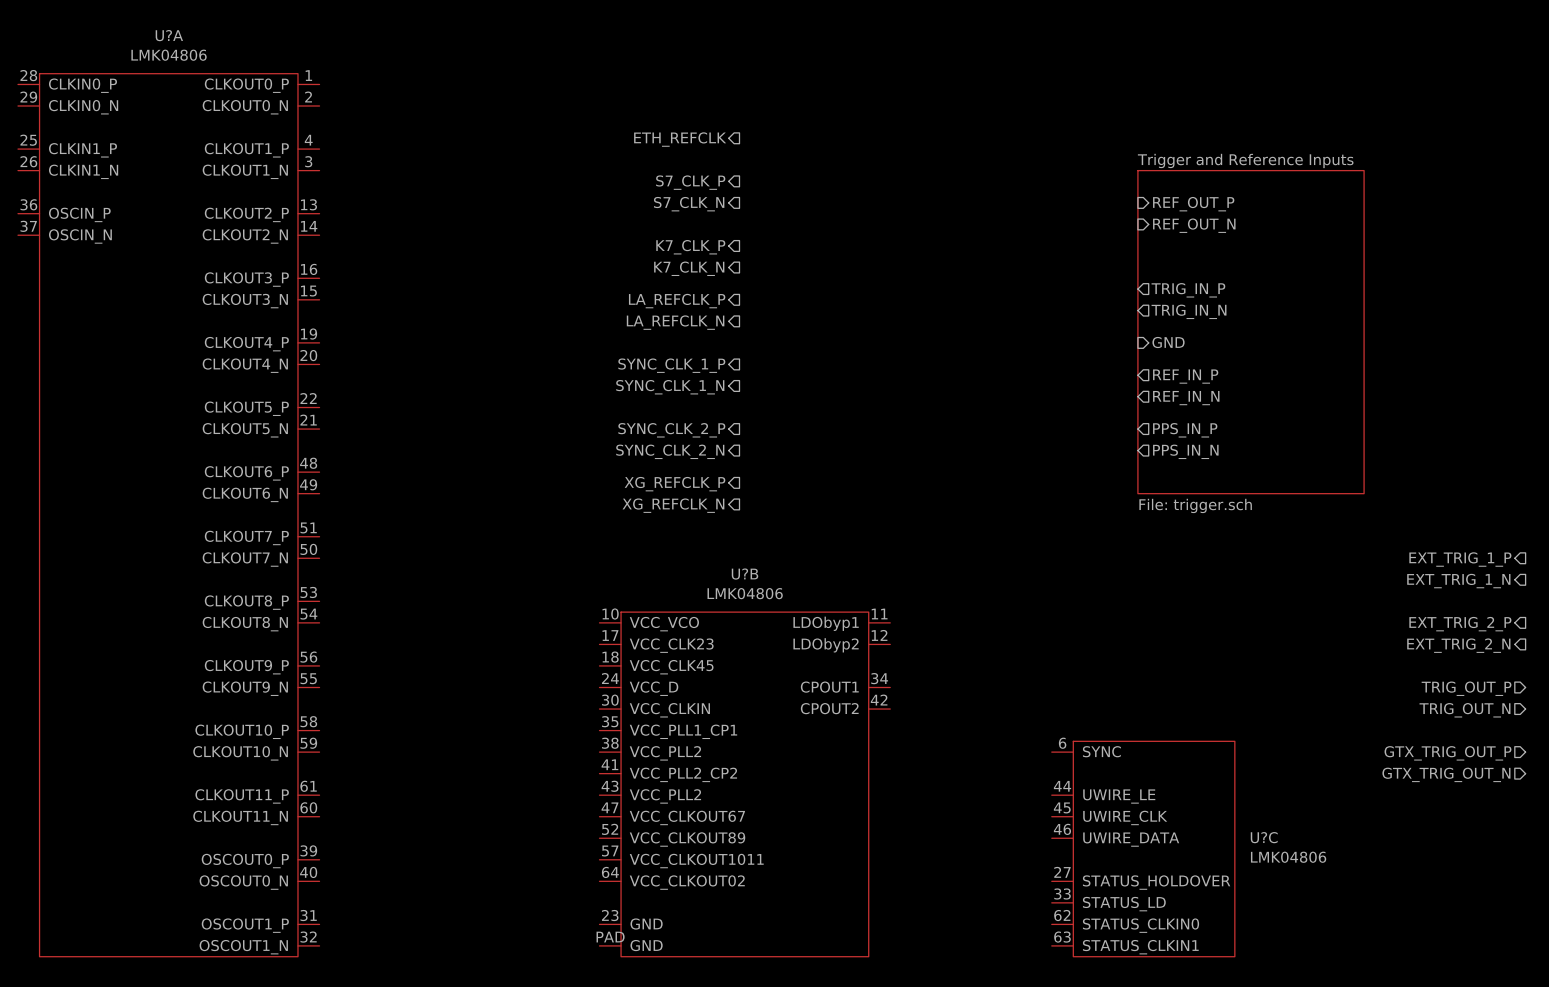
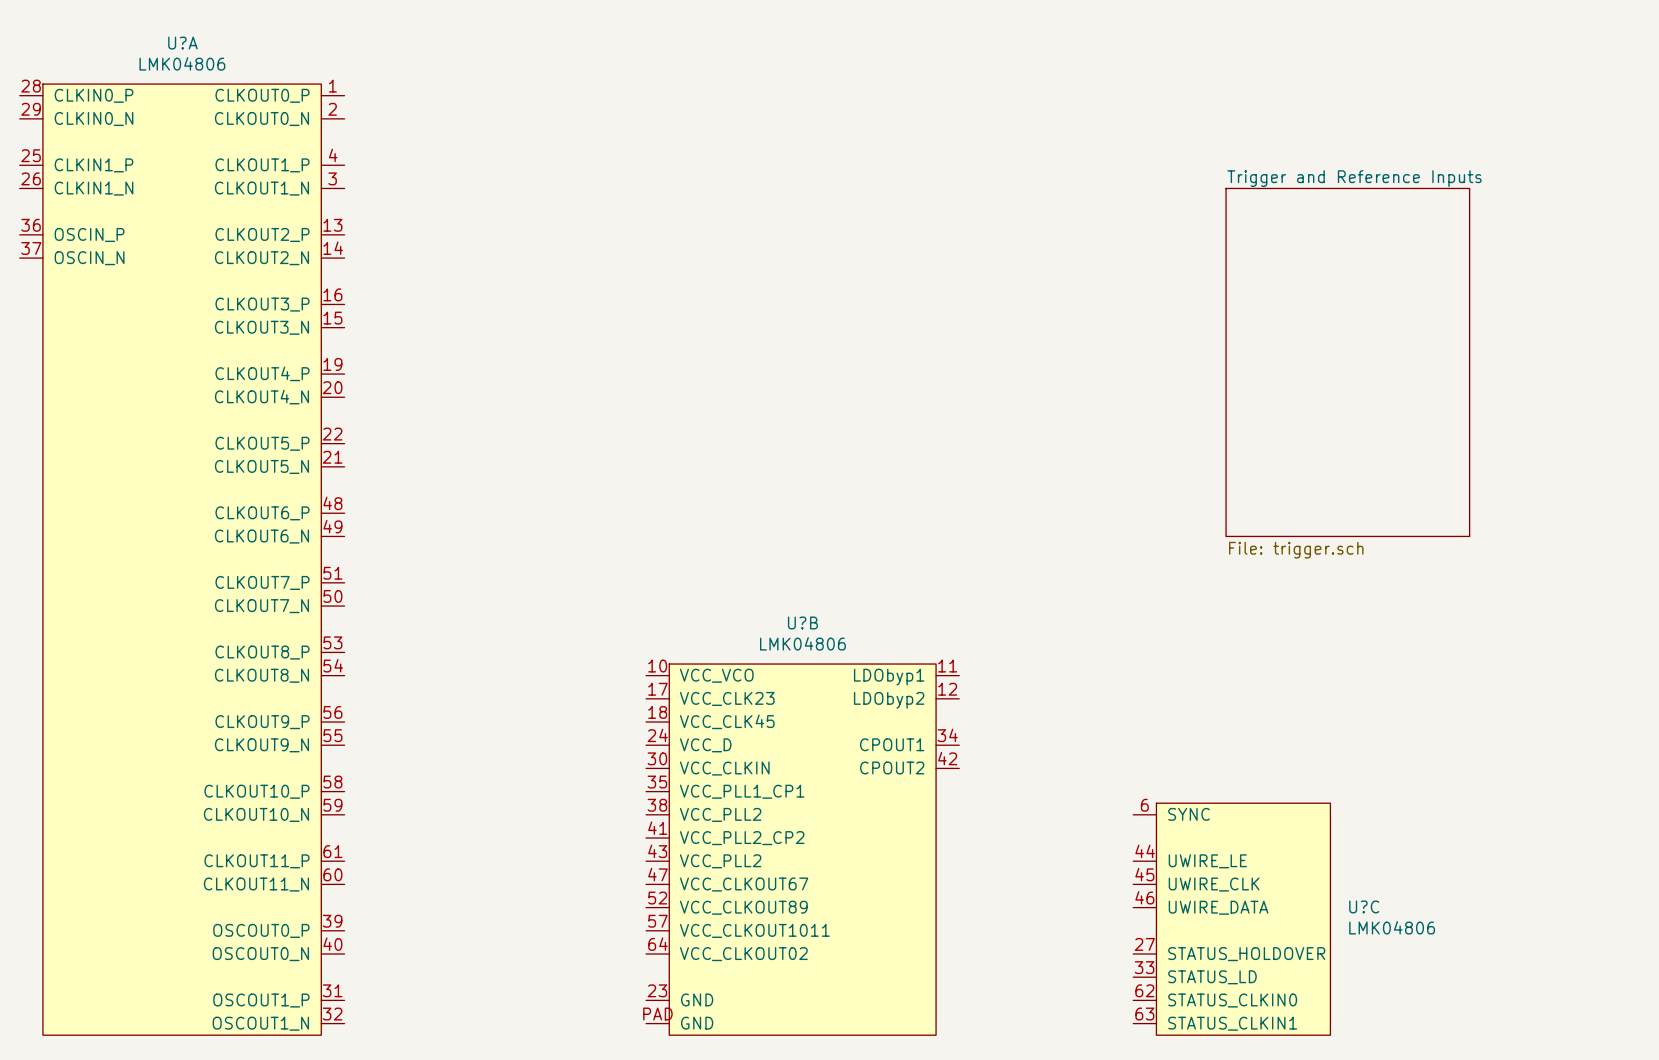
hierarchical label: ETH_REFCLK (680, 139) -> none
hierarchical label: S7_CLK_P (690, 182) -> none
hierarchical label: S7_CLK_N (689, 204) -> none
sheet pin: REF_OUT_P (1193, 204) -> none
sheet pin: REF_OUT_N (1194, 225) -> none
hierarchical label: K7_CLK_P (690, 247) -> none
hierarchical label: K7_CLK_N (689, 268) -> none
sheet pin: TRIG_IN_P (1188, 290) -> none
hierarchical label: LA_REFCLK_P (677, 301) -> none
sheet pin: TRIG_IN_N (1189, 311) -> none
hierarchical label: LA_REFCLK_N (675, 322) -> none
sheet pin: GND (1168, 342) -> none
hierarchical label: SYNC_CLK_1_P (671, 365) -> none
sheet pin: REF_IN_P (1185, 376) -> none
hierarchical label: SYNC_CLK_1_N (670, 387) -> none
sheet pin: REF_IN_N (1186, 398) -> none
hierarchical label: SYNC_CLK_2_P (671, 430) -> none
sheet pin: PPS_IN_P (1185, 430) -> none
hierarchical label: SYNC_CLK_2_N (670, 451) -> none
sheet pin: PPS_IN_N (1185, 451) -> none
hierarchical label: XG_REFCLK_P (675, 484) -> none
hierarchical label: XG_REFCLK_N (673, 505) -> none
hierarchical label: EXT_TRIG_1_P (1460, 559) -> none
hierarchical label: EXT_TRIG_1_N (1458, 581) -> none
hierarchical label: EXT_TRIG_2_P (1460, 624) -> none
hierarchical label: EXT_TRIG_2_N (1458, 645) -> none
hierarchical label: TRIG_OUT_P (1466, 688) -> none
hierarchical label: TRIG_OUT_N (1464, 710) -> none
hierarchical label: GTX_TRIG_OUT_P (1447, 753) -> none
hierarchical label: GTX_TRIG_OUT_N (1446, 774) -> none

